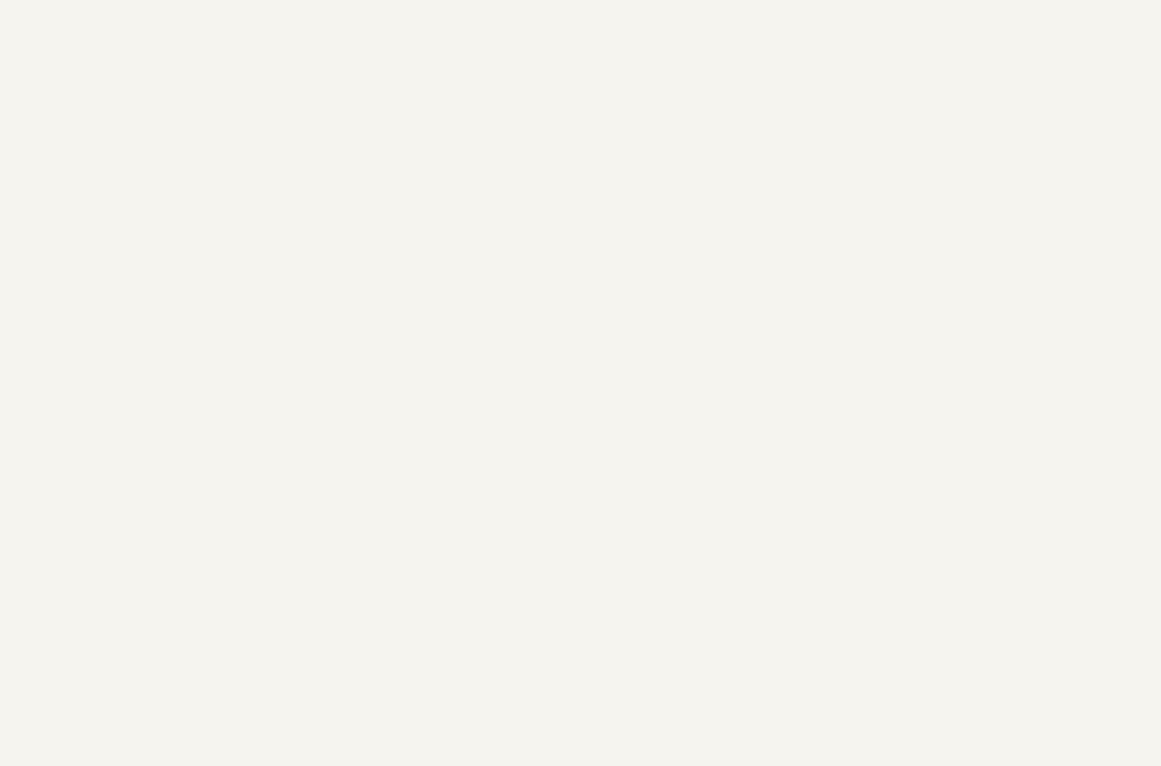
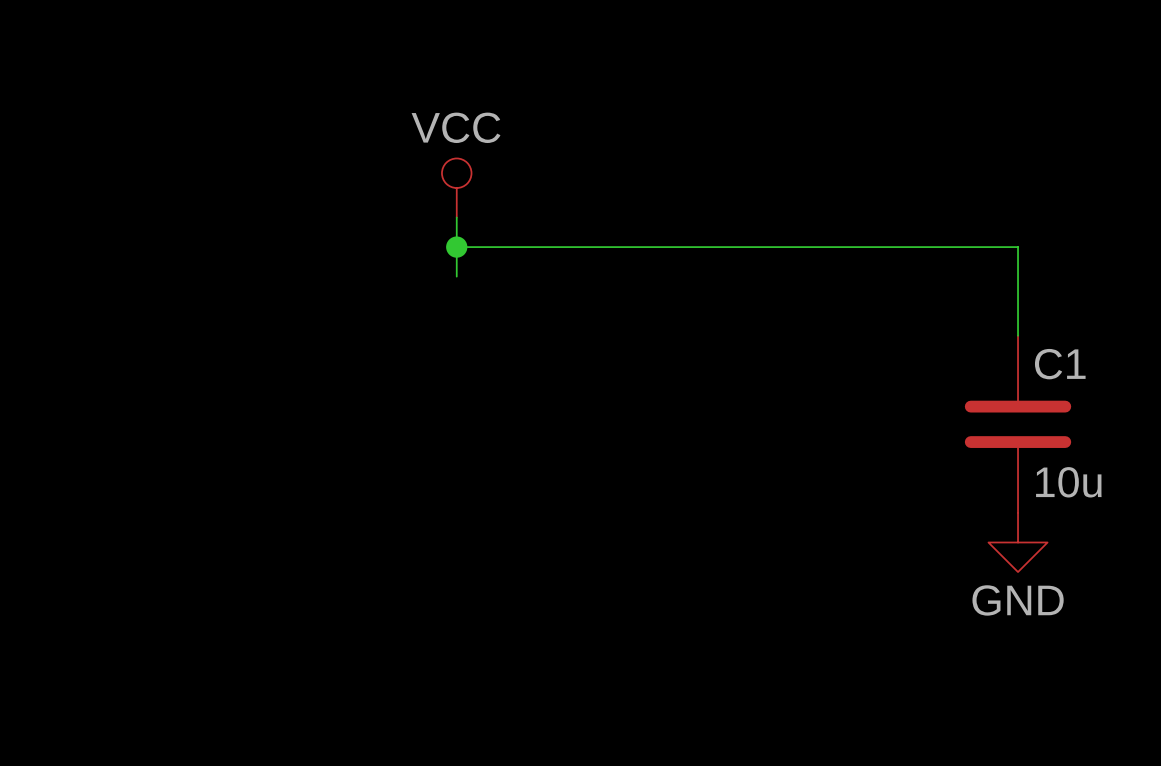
power symbol: none -> VCC (456, 188)
wire: none -> (456, 217) (456, 276)
wire: none -> (456, 247) (1018, 247) (1018, 335)
junction: none -> (456, 247)
C1: none -> 10u (1018, 424)
power symbol: none -> GND (1018, 542)

